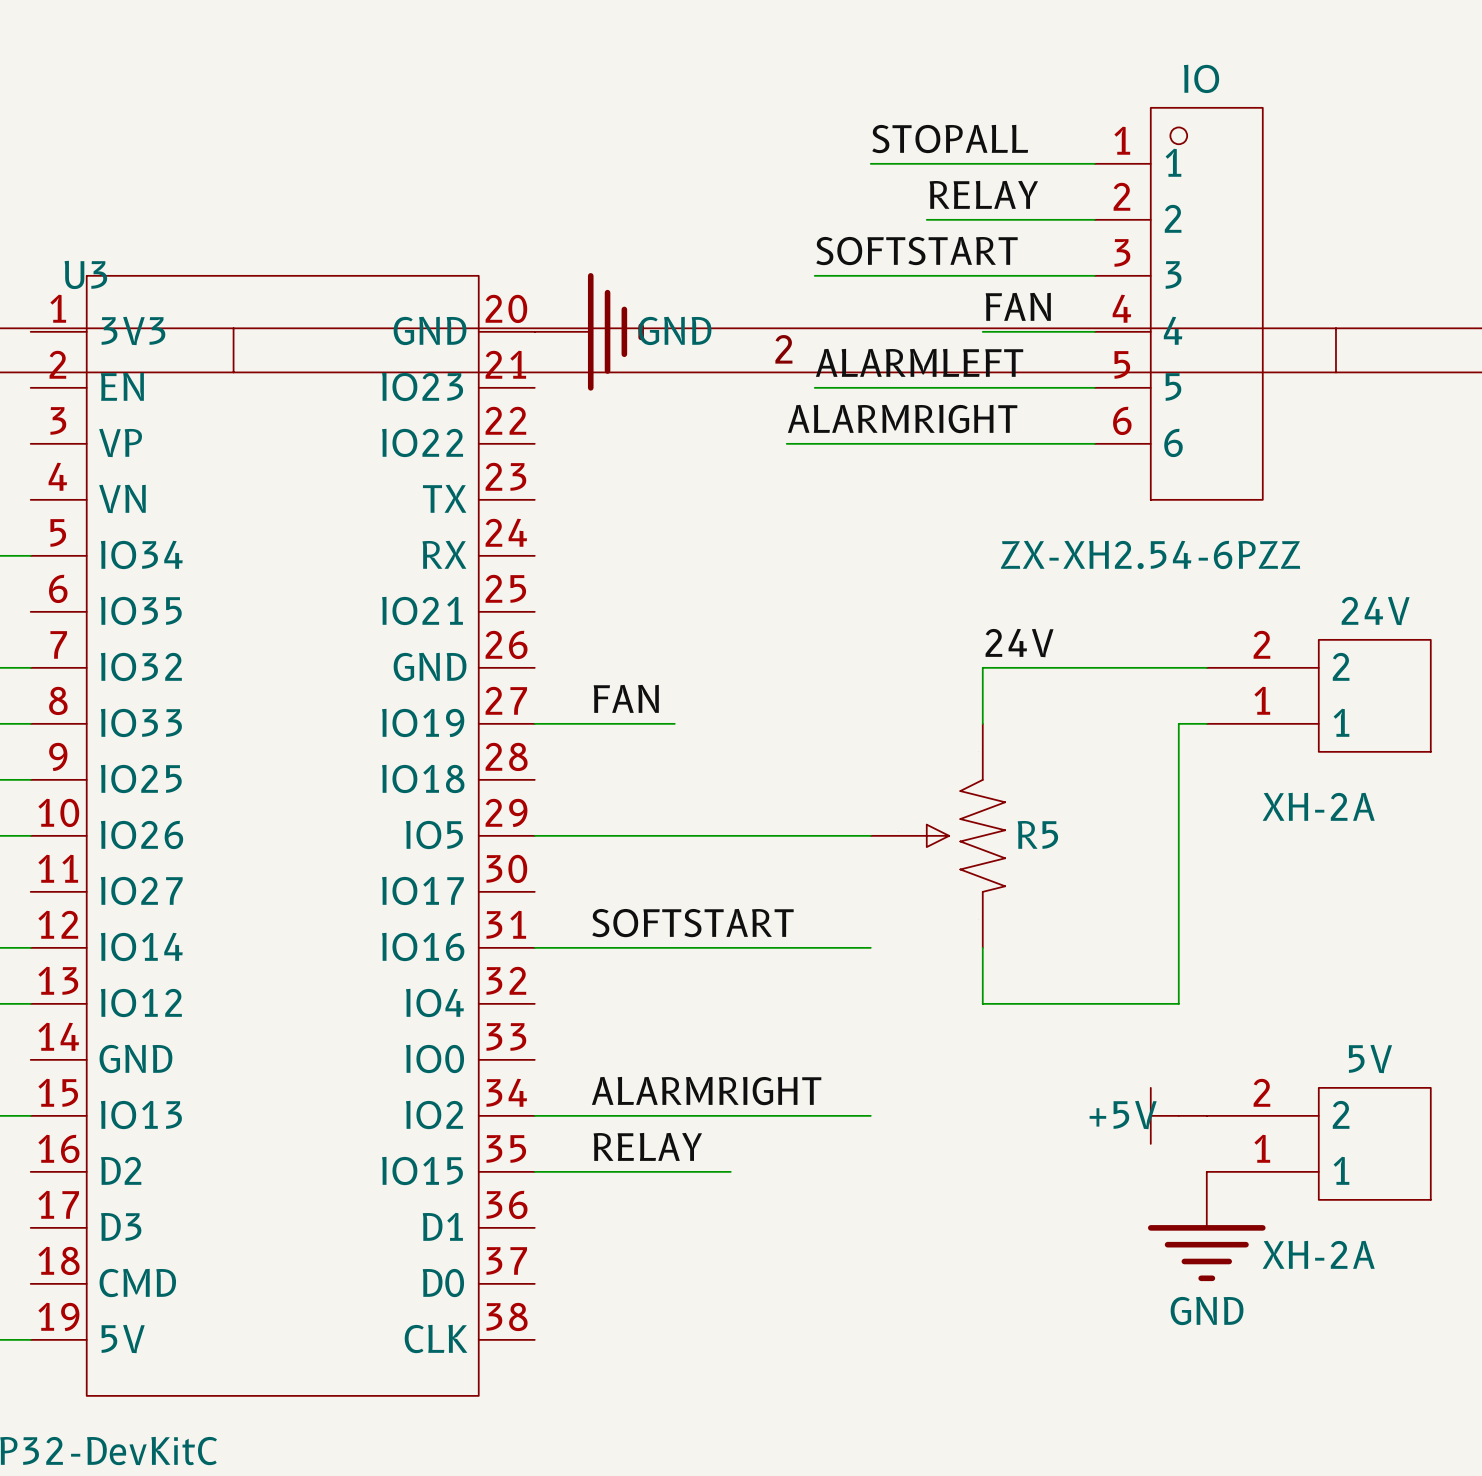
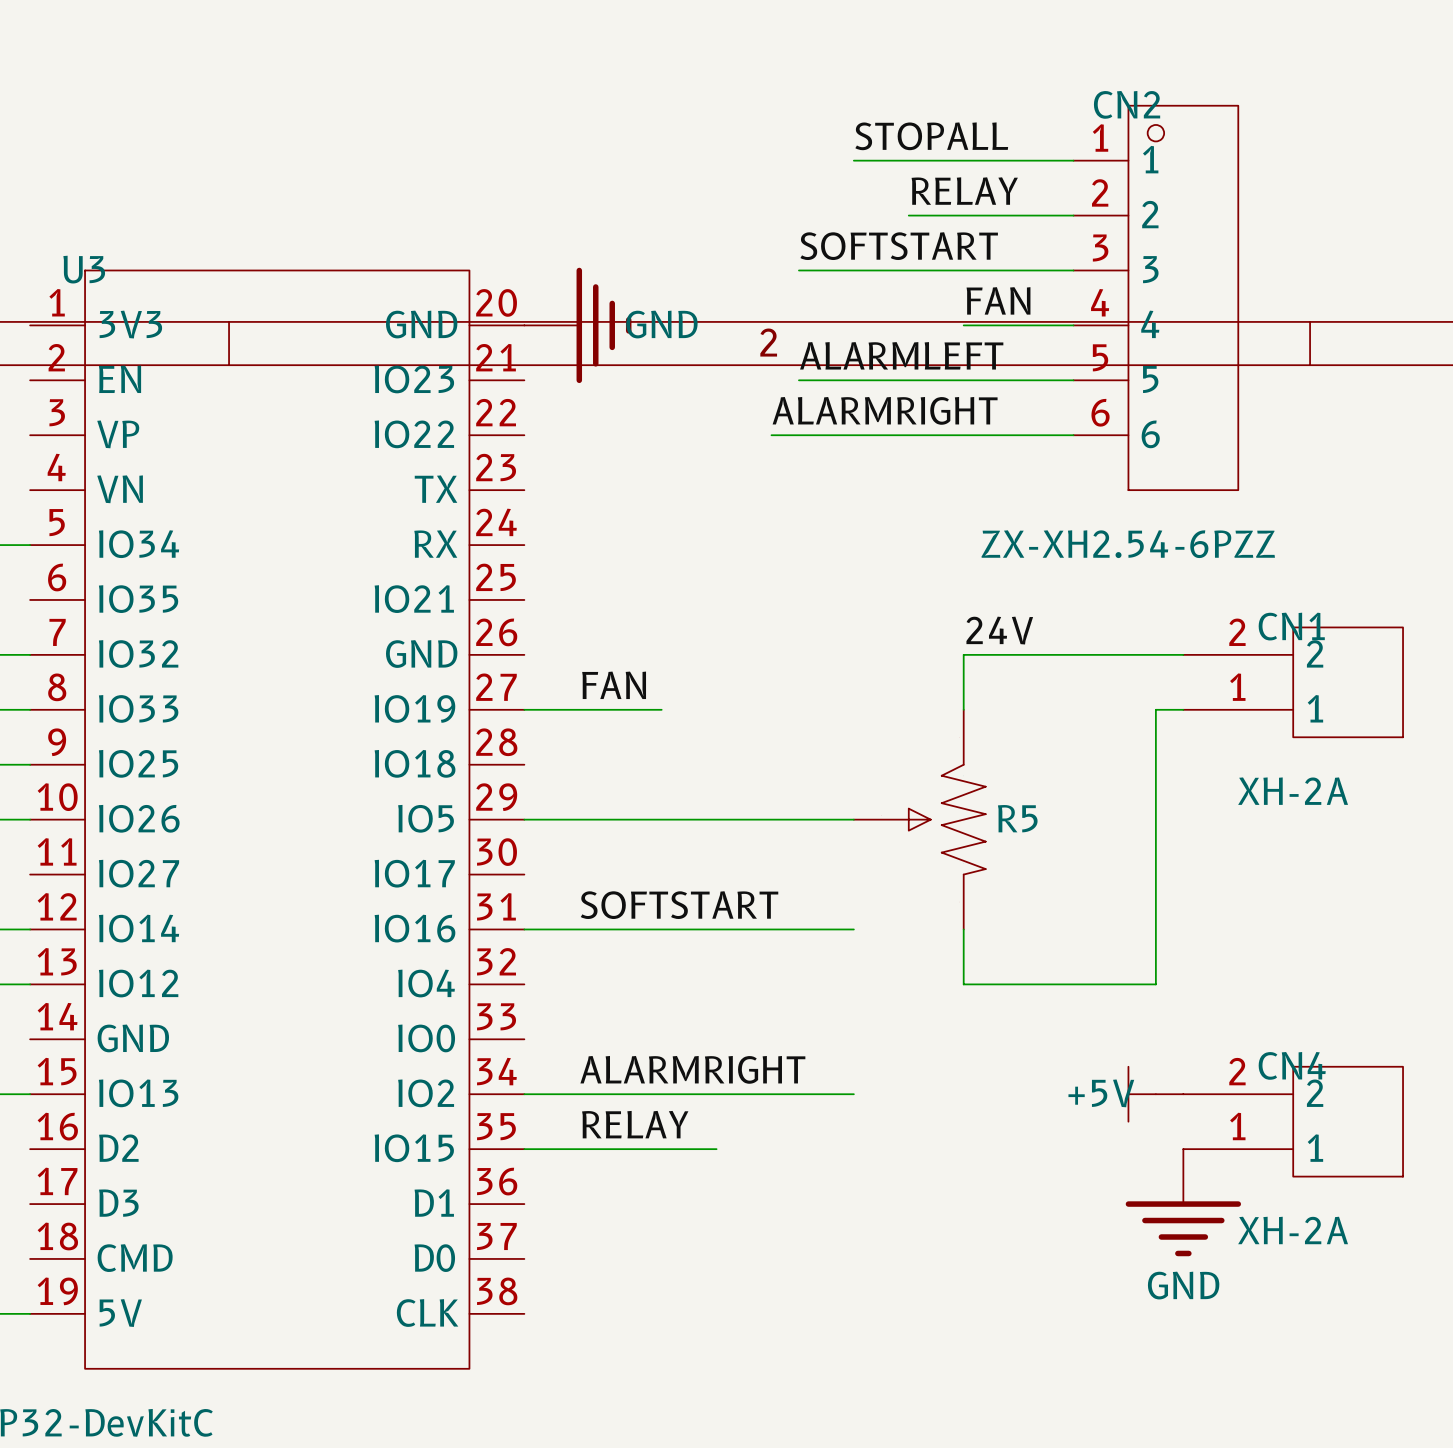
IO name: IO (1201, 78) -> CN2 (1127, 104)
24V name: 24V (1375, 610) -> CN1 (1291, 626)
5V name: 5V (1370, 1059) -> CN4 (1292, 1065)

